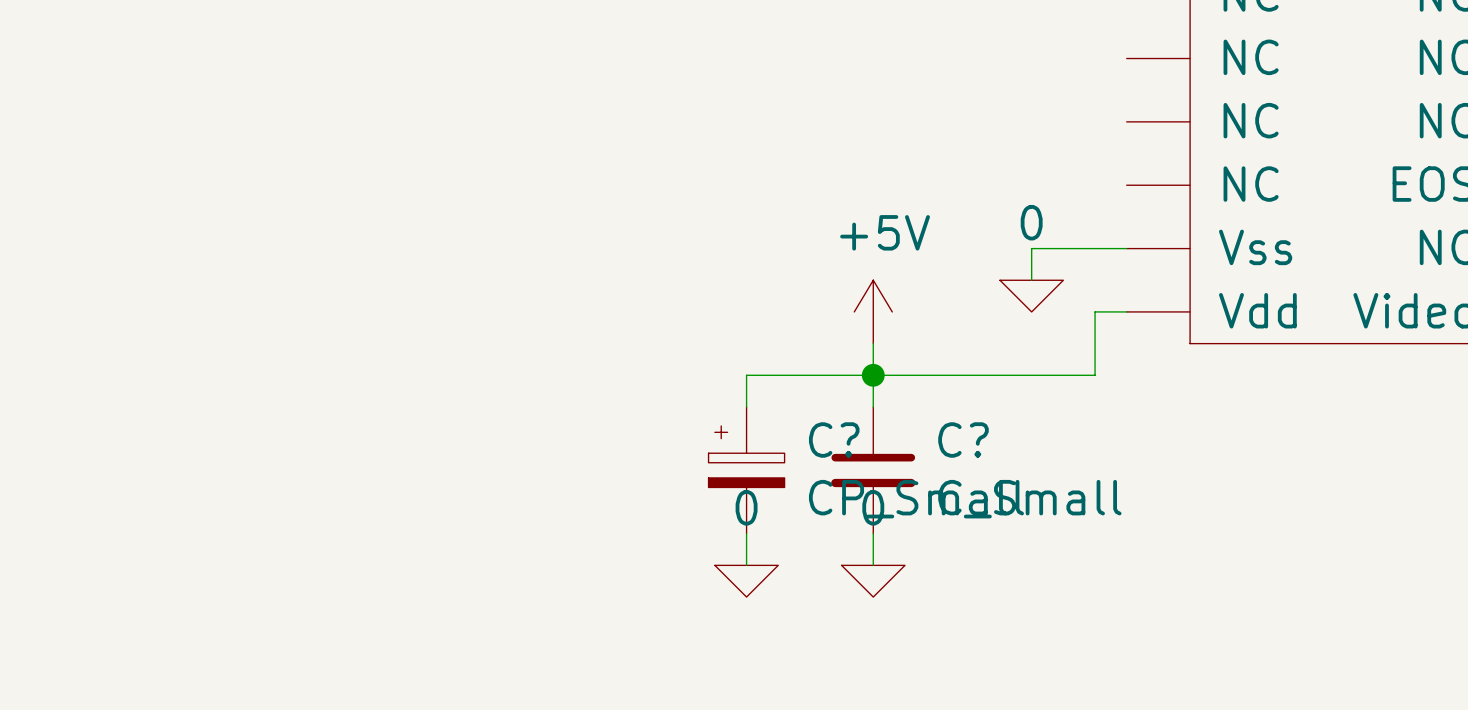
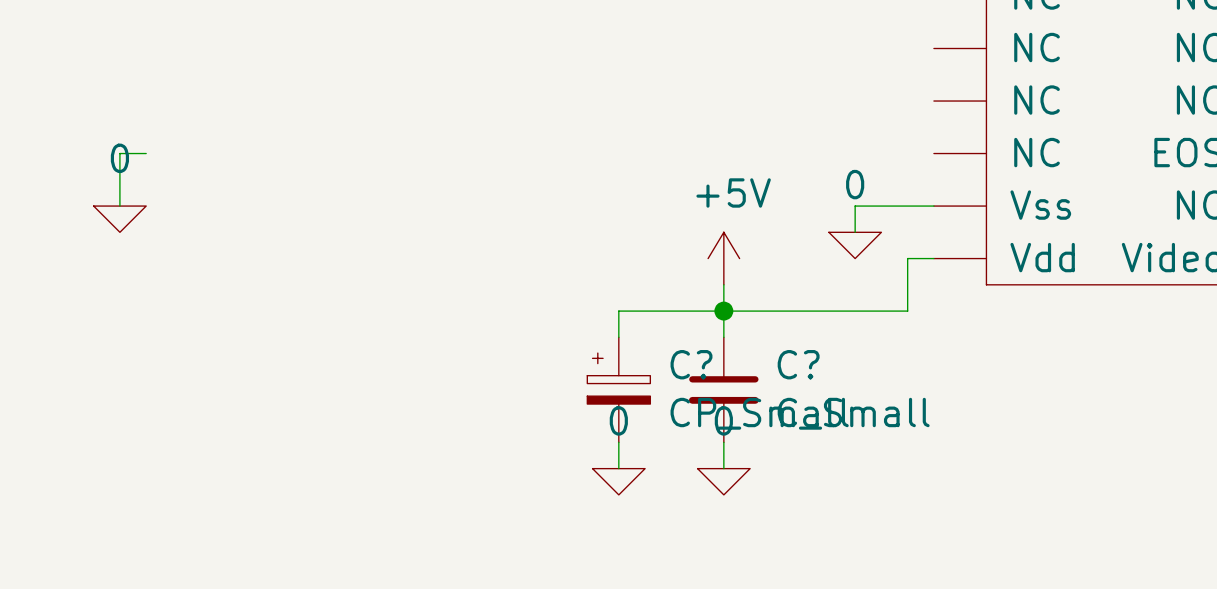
wire: none -> (146, 153) (119, 153) (119, 206)
power symbol: none -> 0 (119, 219)

